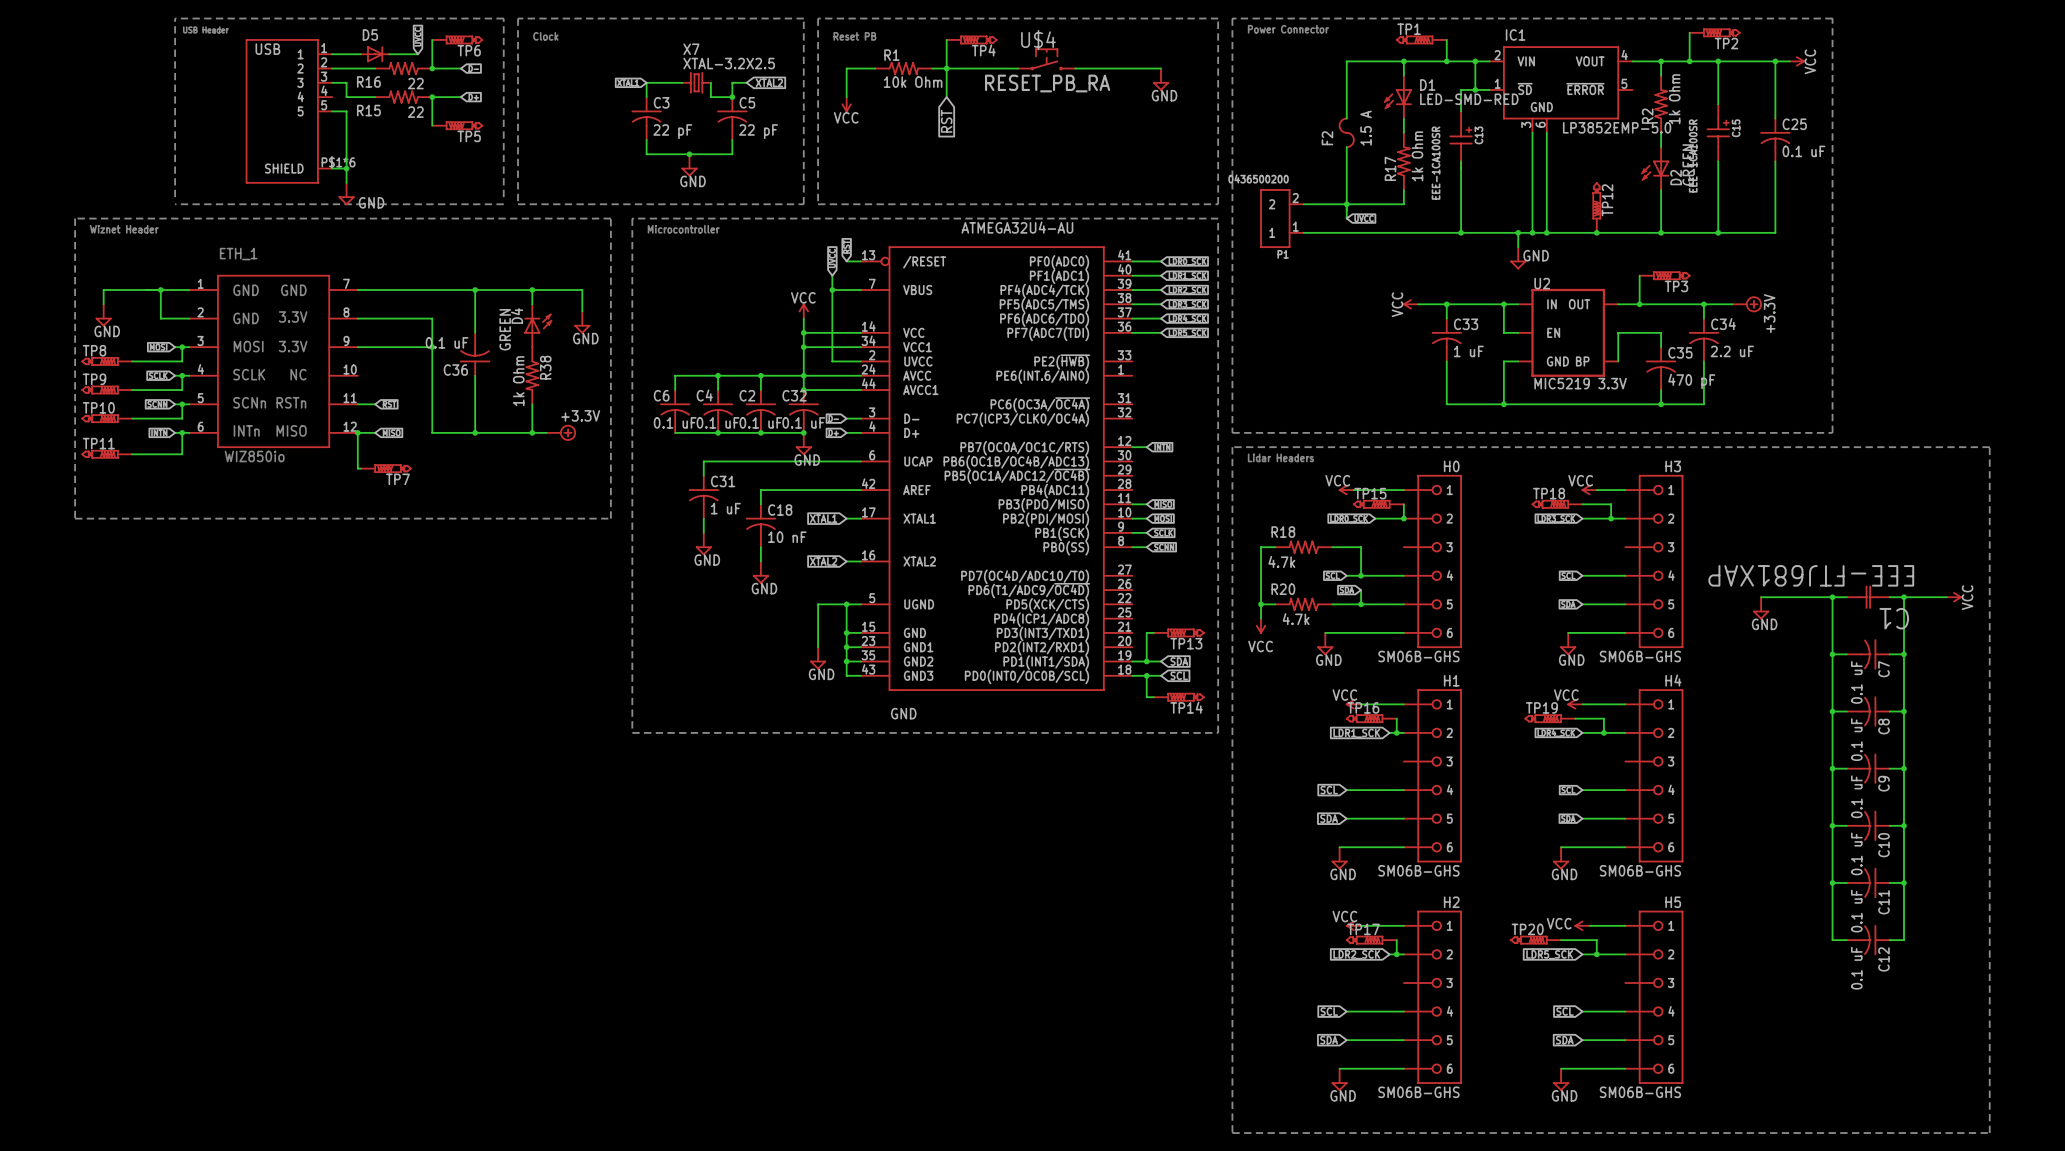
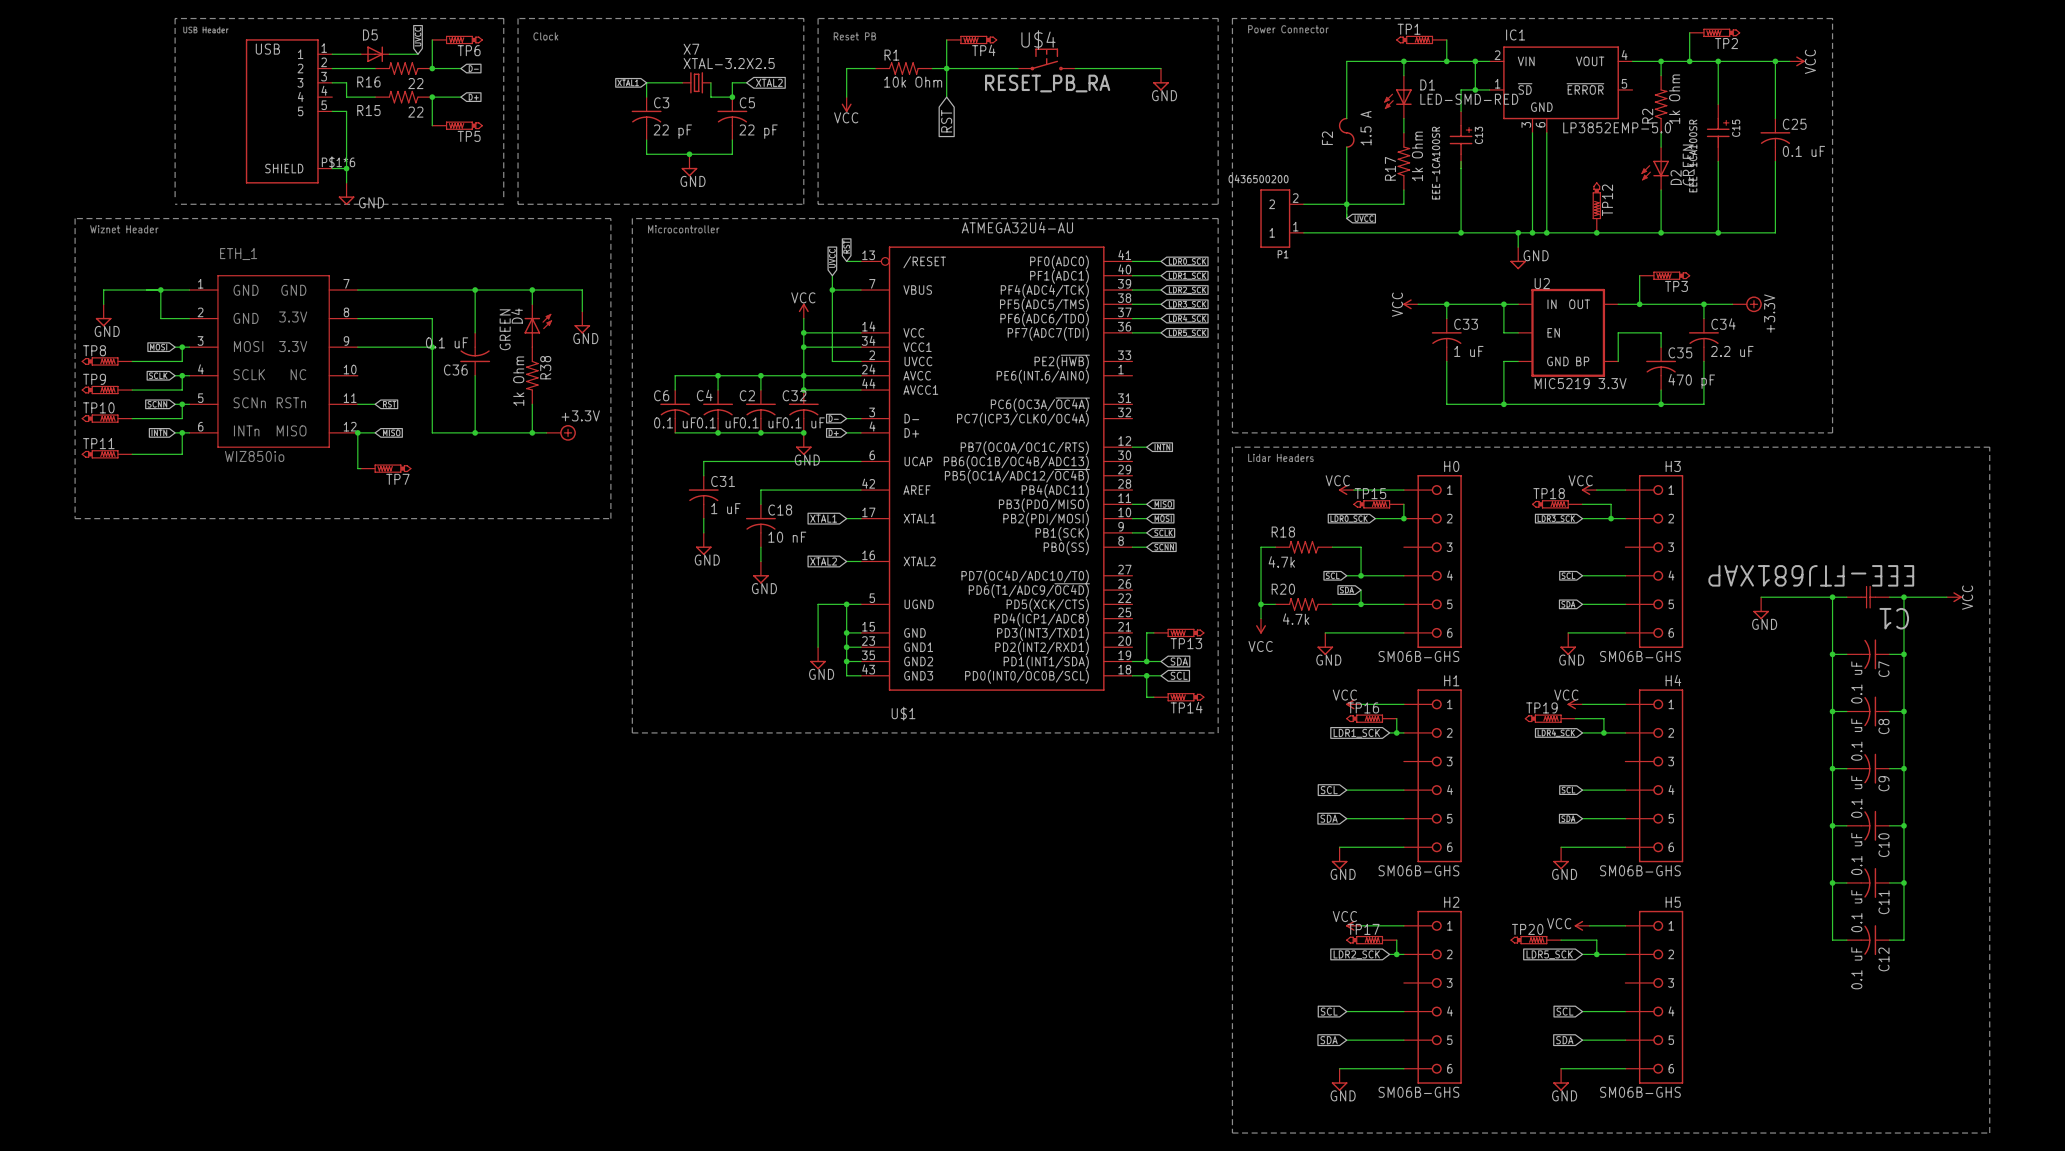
GND name: GND (903, 713) -> U$1 (903, 713)

